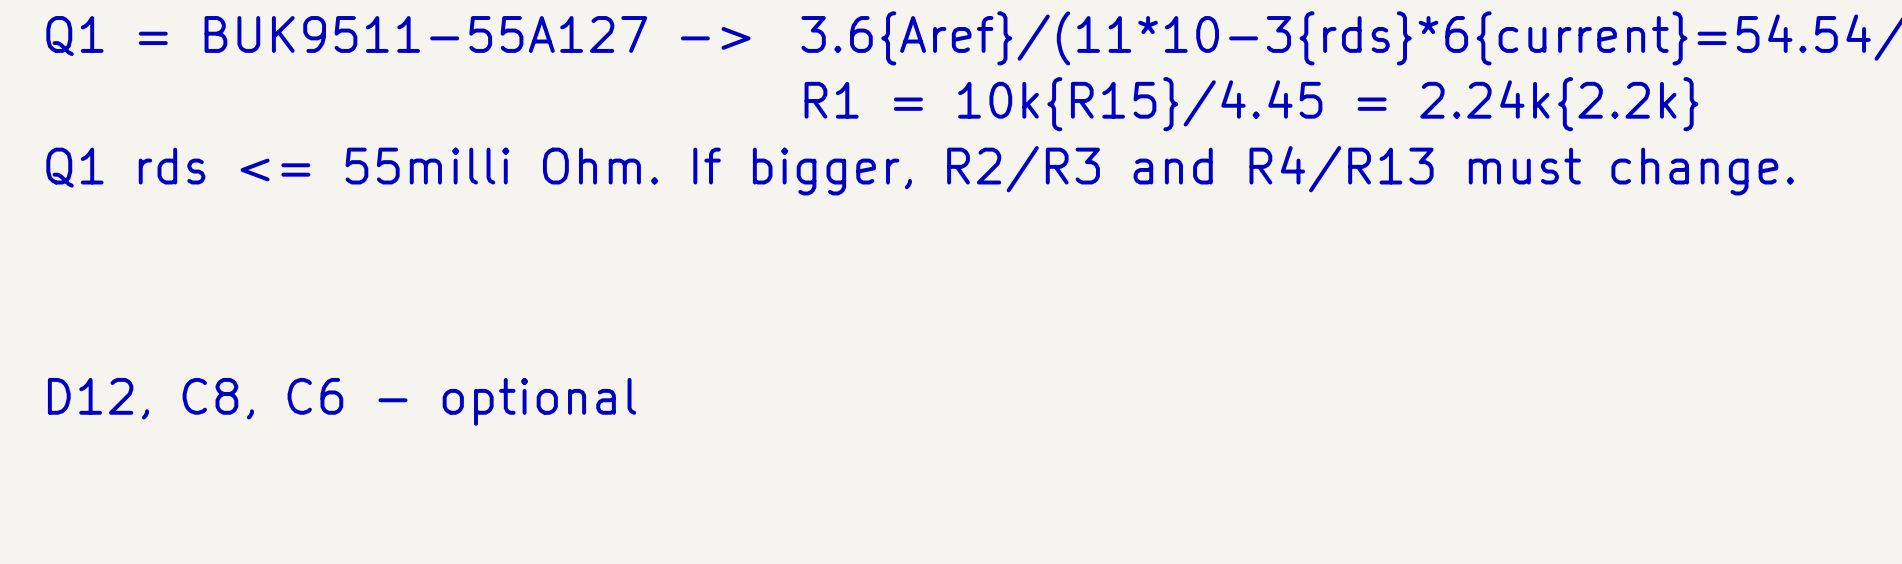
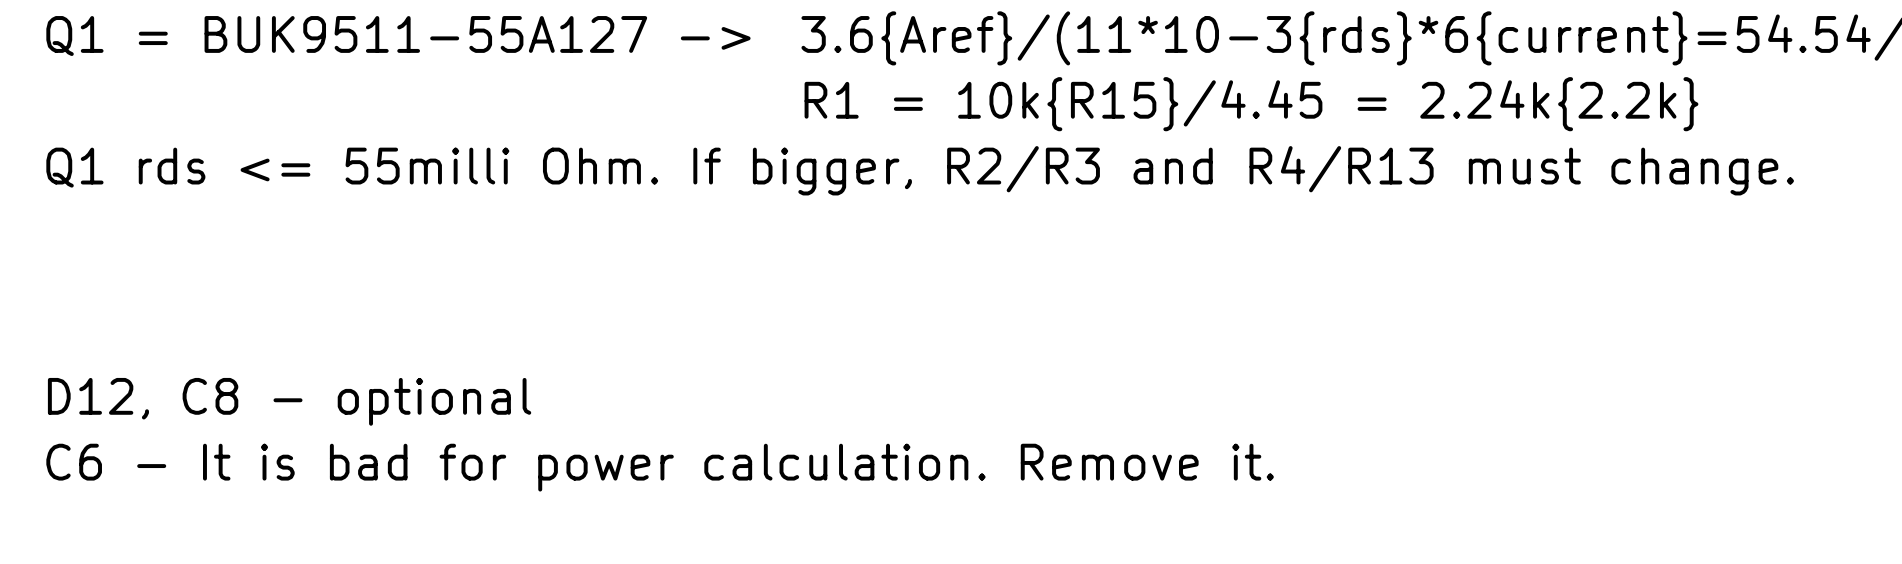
text: D12, C8, C6 - optional (342, 401) -> D12, C8 - optional (289, 401)
text: none -> C6 - It is bad for power calculation. Remove it. (660, 467)

